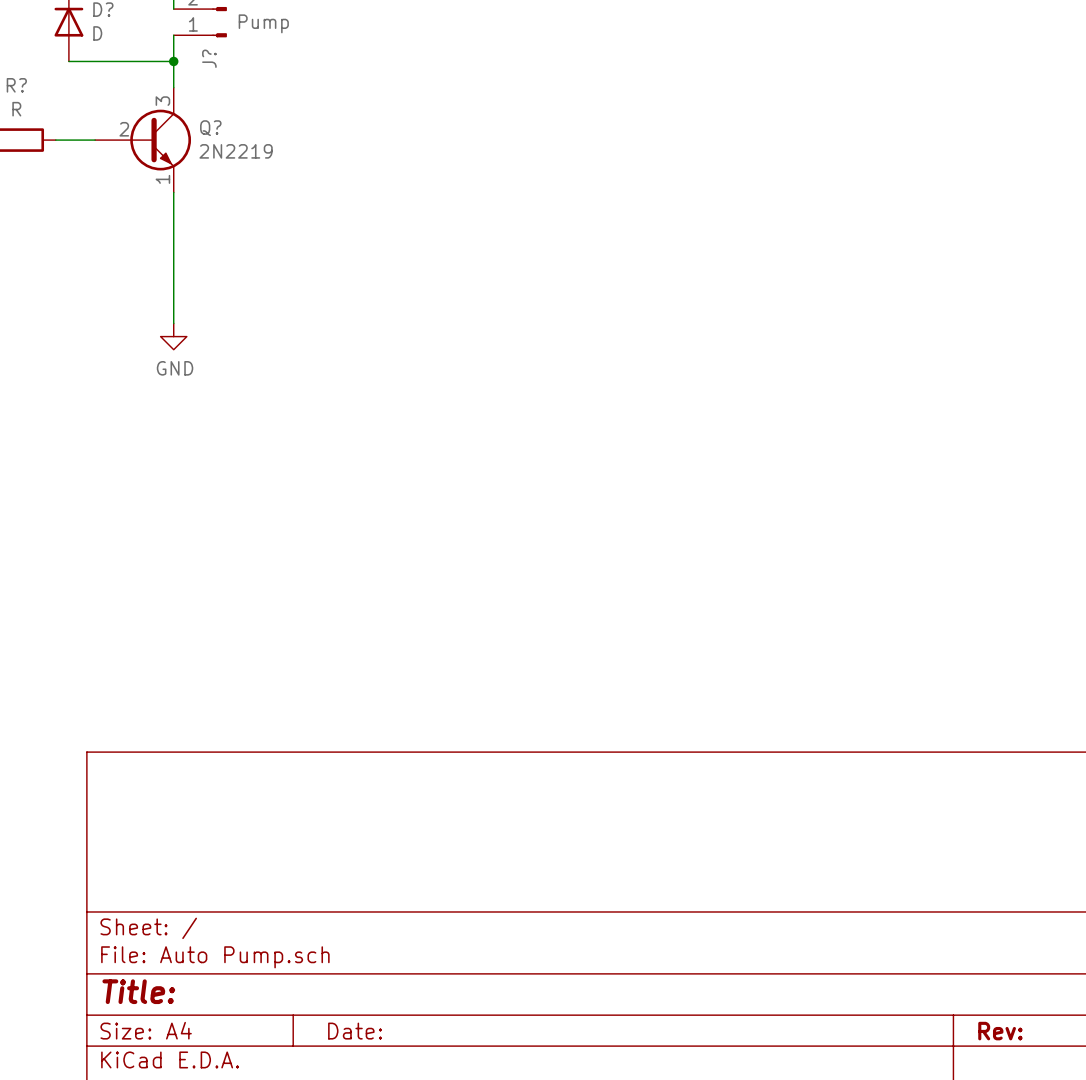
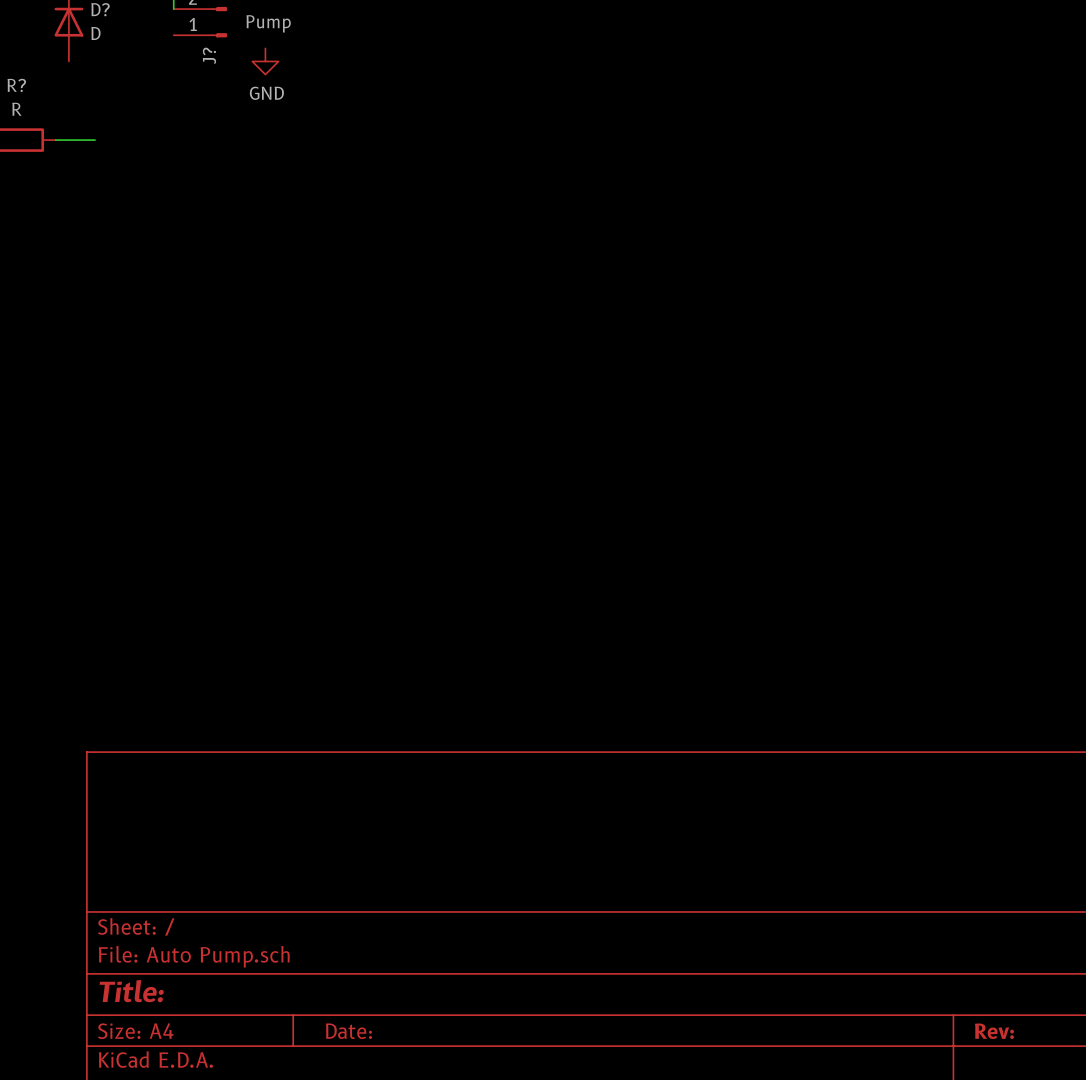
wire: (173, 35) (173, 87) -> none
wire: (68, 61) (173, 61) -> none
junction: (173, 61) -> none
power symbol: none -> GND (265, 61)
Q?: 2N2219 (143, 140) -> none
wire: (173, 192) (173, 323) -> none
power symbol: GND (173, 336) -> none

